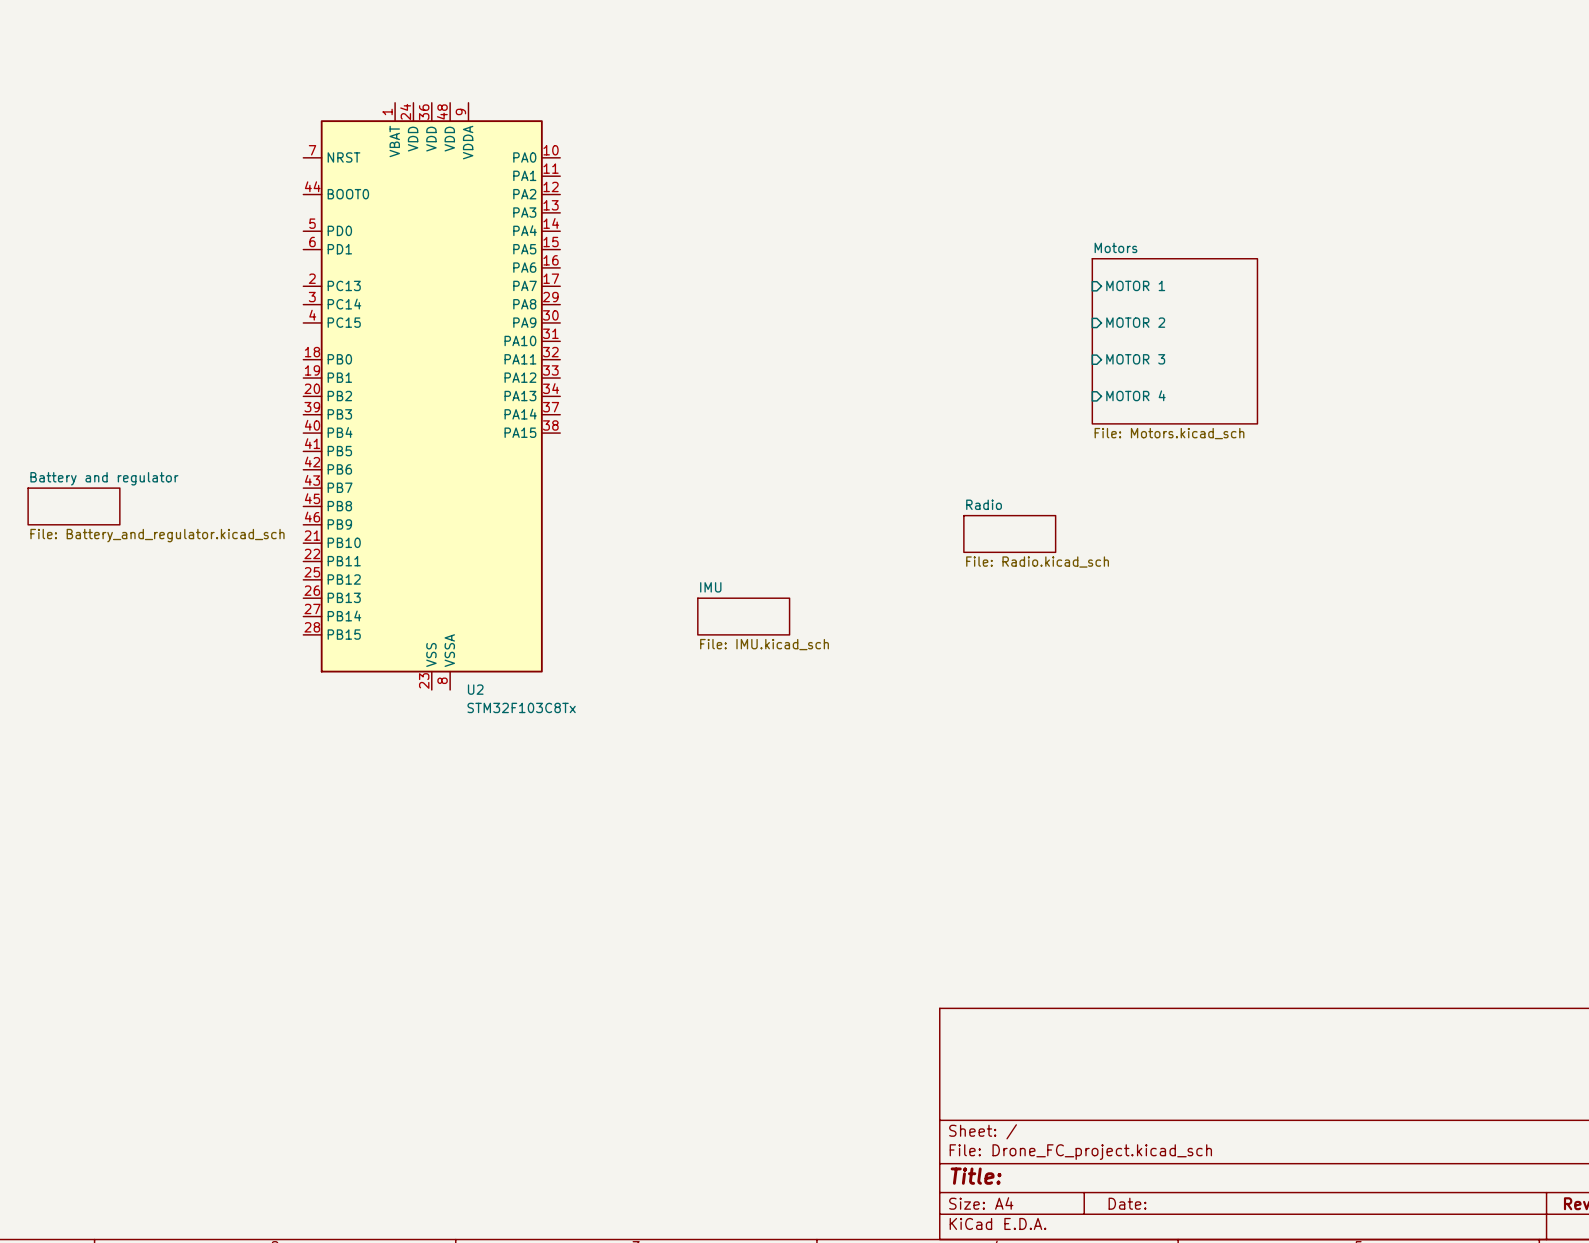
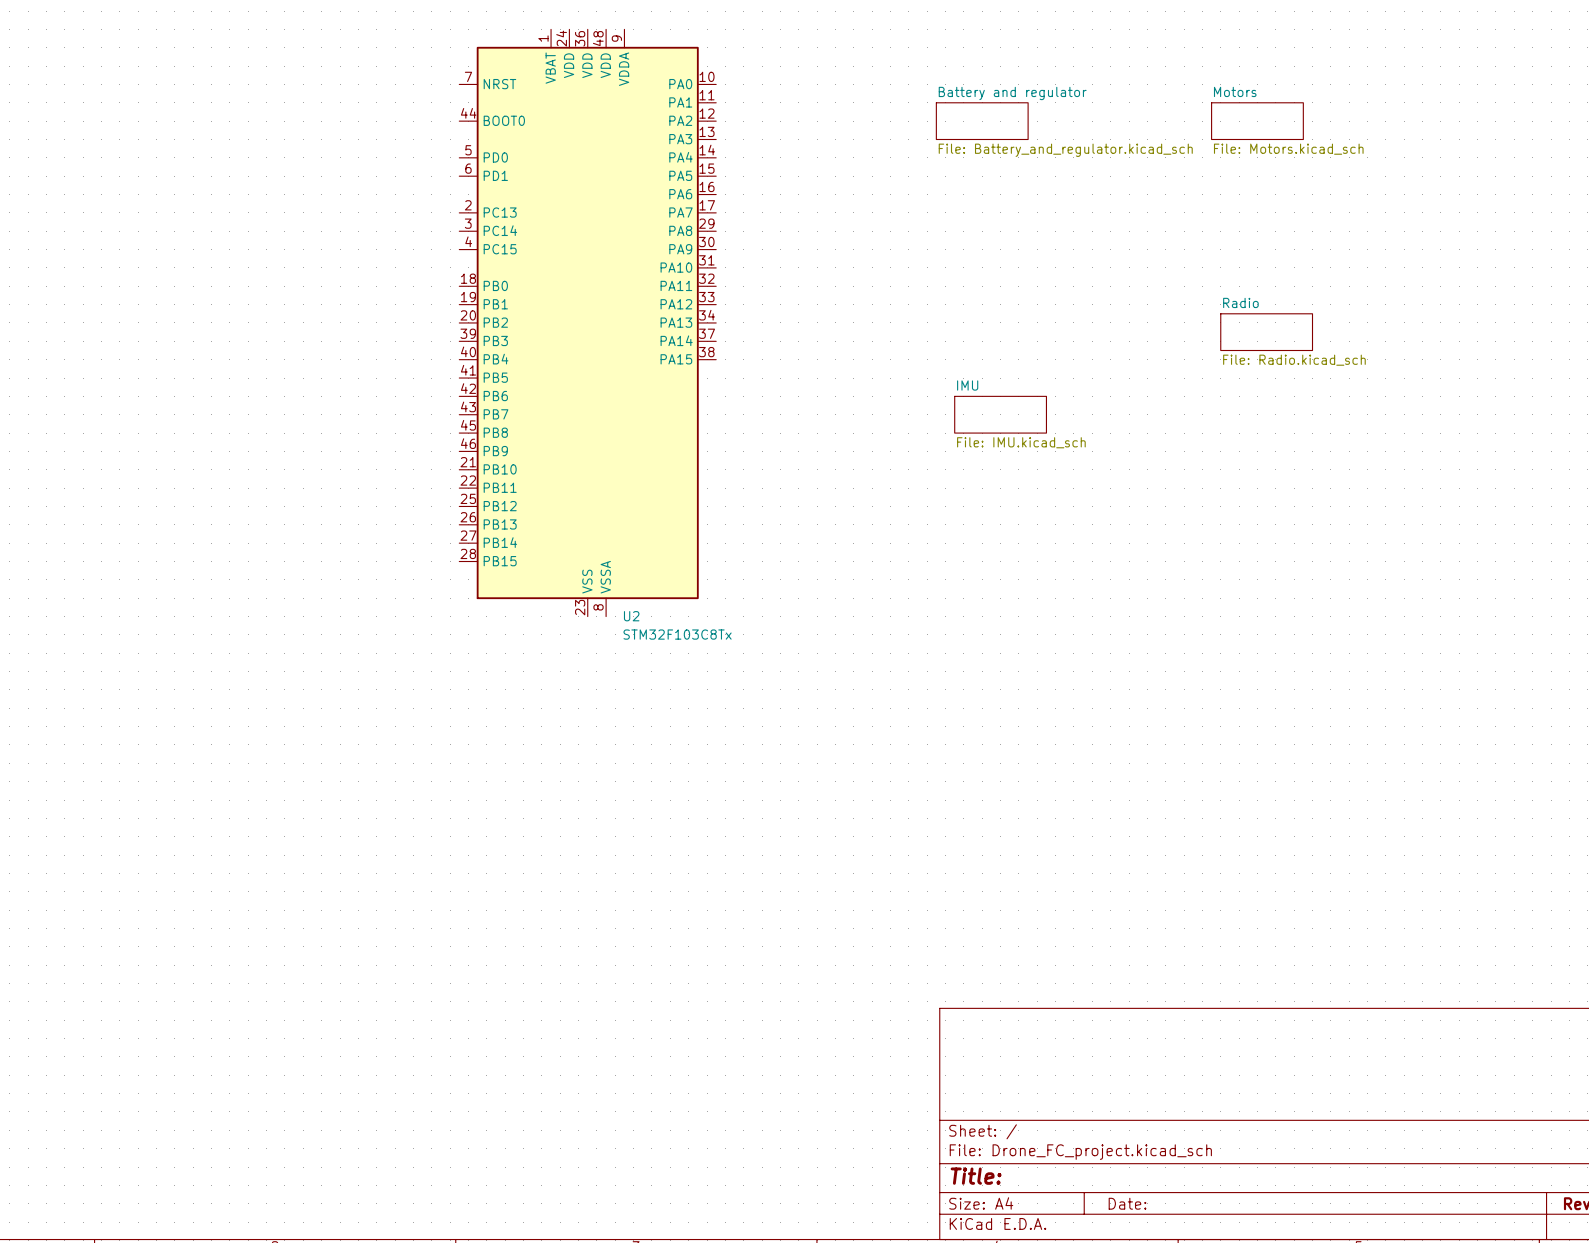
sheet Battery and regulator: none -> File: Battery_and_regulator.kicad_sch (982, 121)
sheet Motors: none -> File: Motors.kicad_sch (1257, 121)
sheet pin: MOTOR 1 (1135, 285) -> none
sheet pin: MOTOR 2 (1135, 322) -> none
sheet Radio: none -> File: Radio.kicad_sch (1266, 332)
sheet Motors: File: Motors.kicad_sch (1174, 341) -> none
sheet pin: MOTOR 3 (1135, 359) -> none
sheet pin: MOTOR 4 (1135, 395) -> none
U2 position: (431, 396) -> (587, 322)
sheet IMU: none -> File: IMU.kicad_sch (1000, 414)
sheet Battery and regulator: File: Battery_and_regulator.kicad_sch (73, 506) -> none
sheet Radio: File: Radio.kicad_sch (1009, 533) -> none
sheet IMU: File: IMU.kicad_sch (743, 616) -> none

